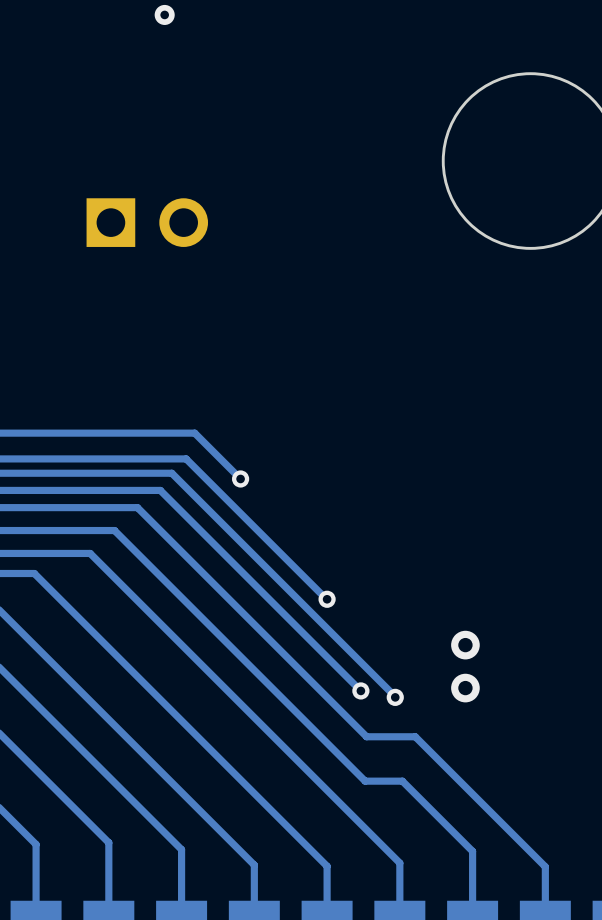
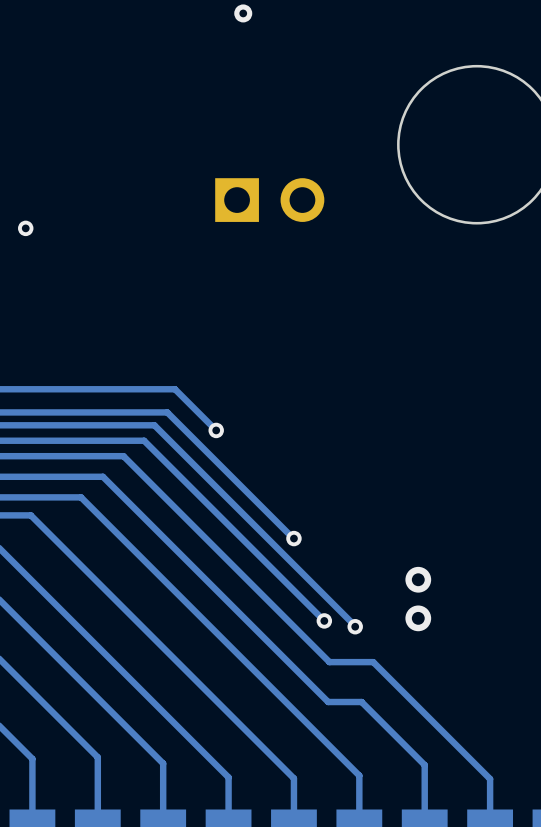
via position: (164, 14) -> (243, 13)
part position: (147, 222) -> (269, 200)
via: none -> (25, 228)

